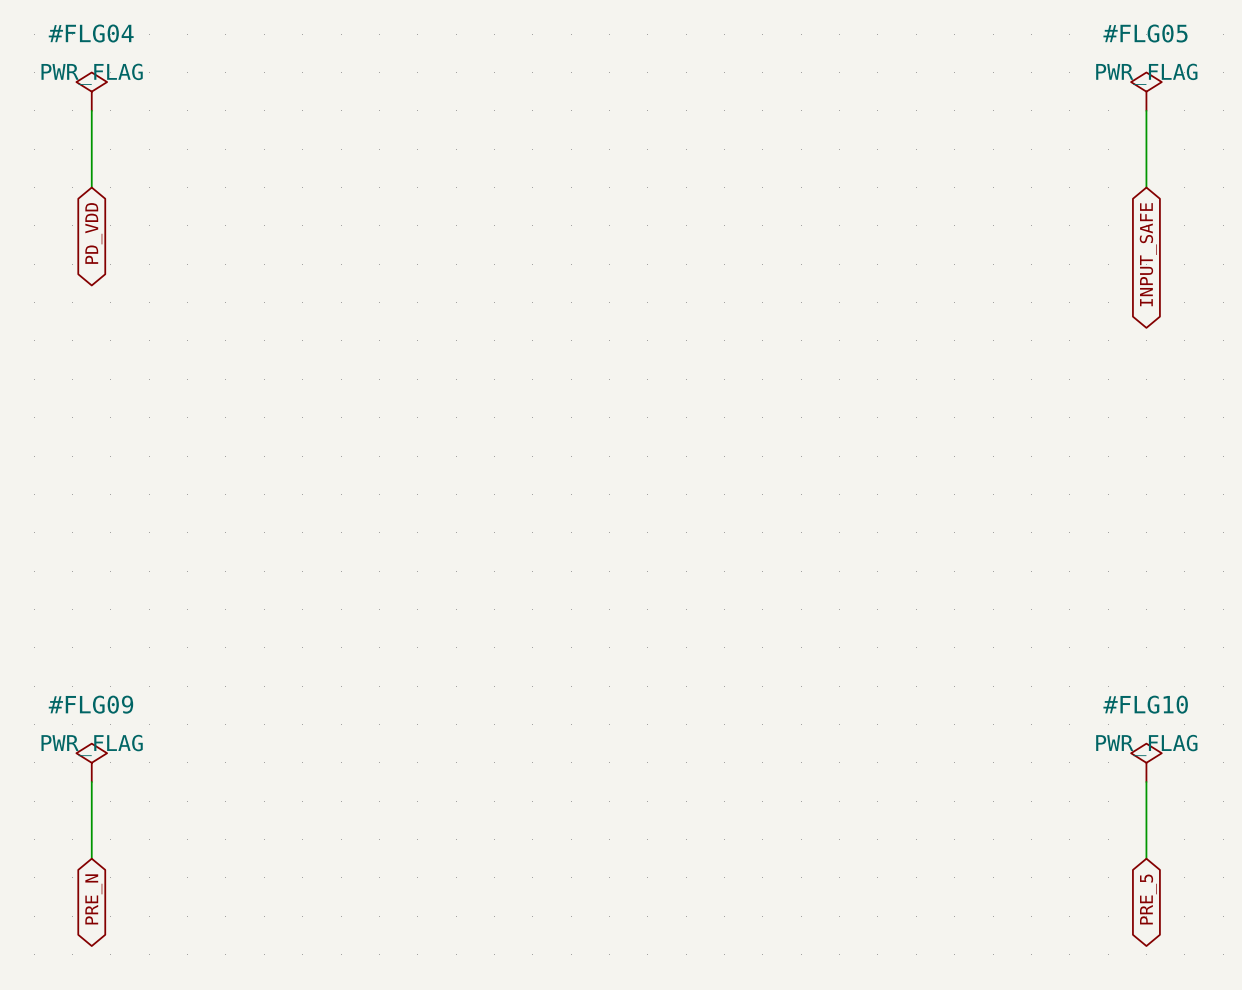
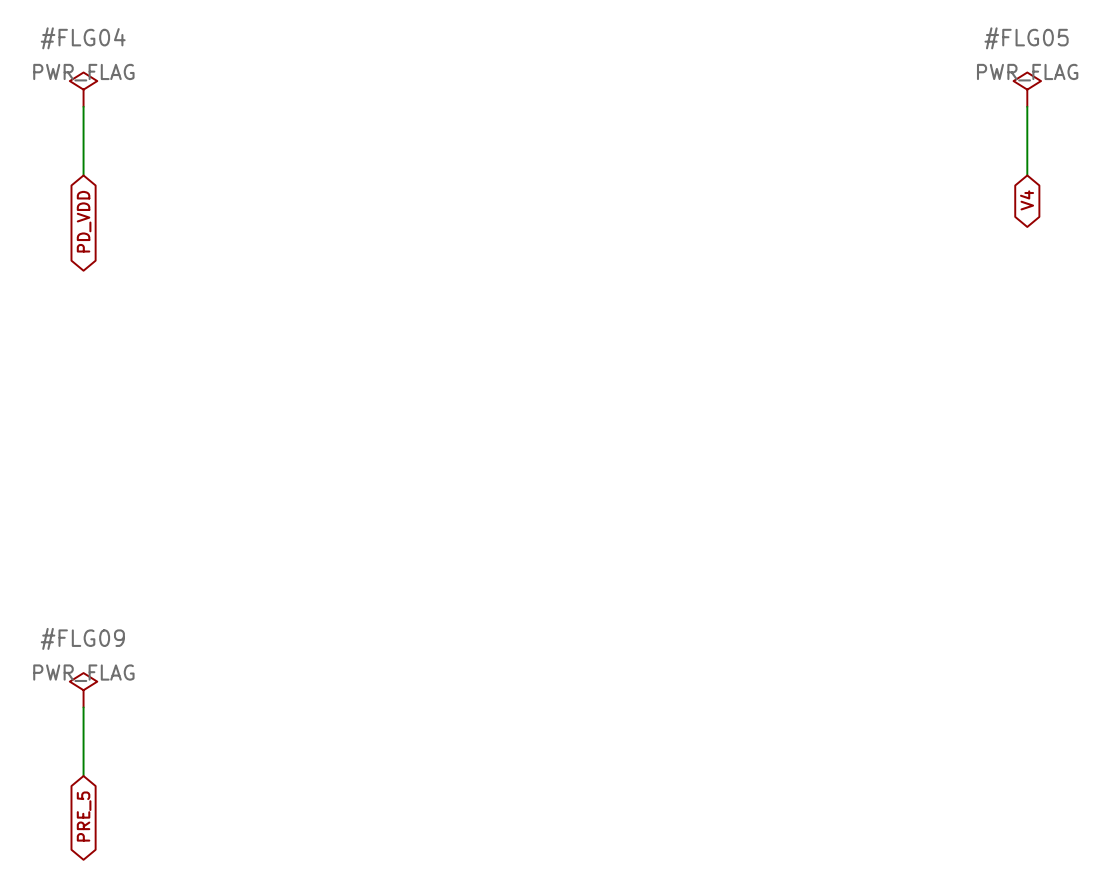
global label: INPUT_SAFE (1148, 254) -> V4 (1027, 200)
#FLG10: PWR_FLAG (1146, 762) -> none
wire: (1146, 781) (1146, 858) -> none
global label: PRE_N (93, 899) -> PRE_5 (84, 816)
global label: PRE_5 (1148, 899) -> none

